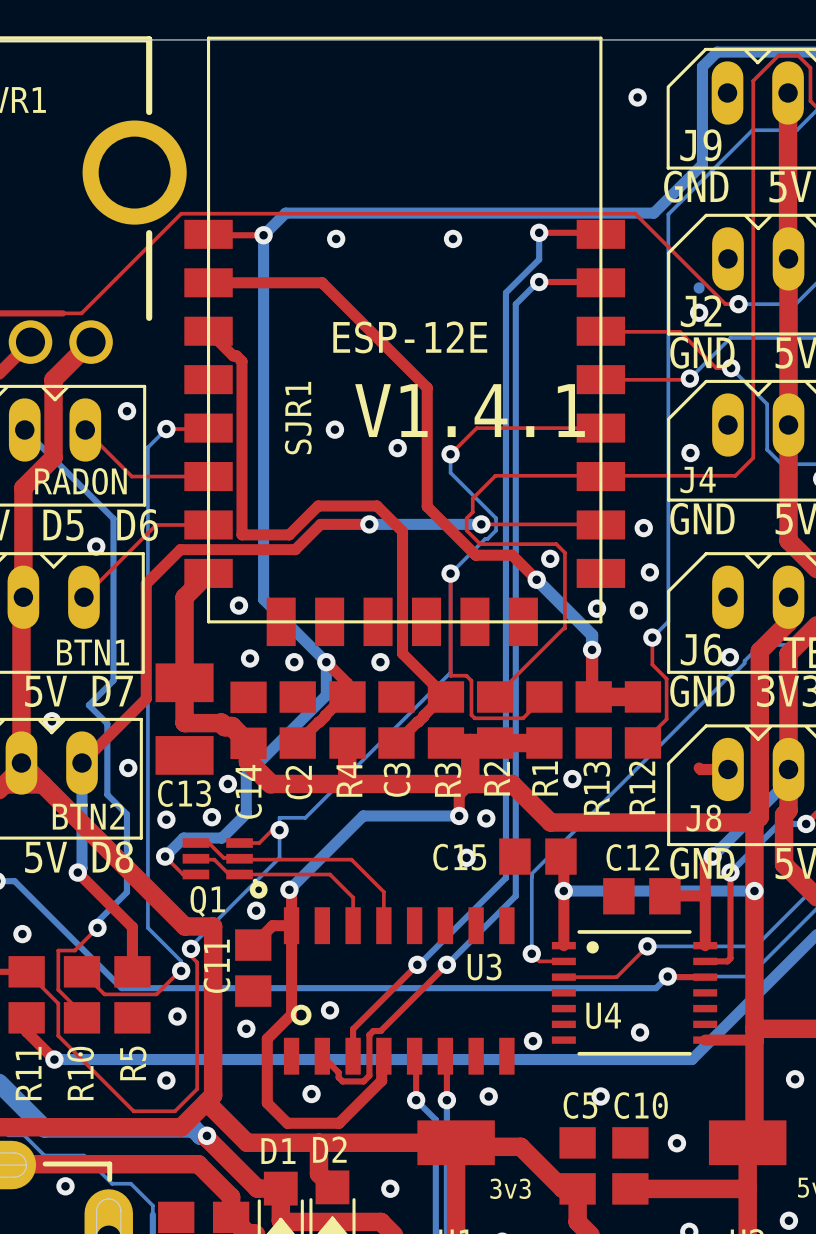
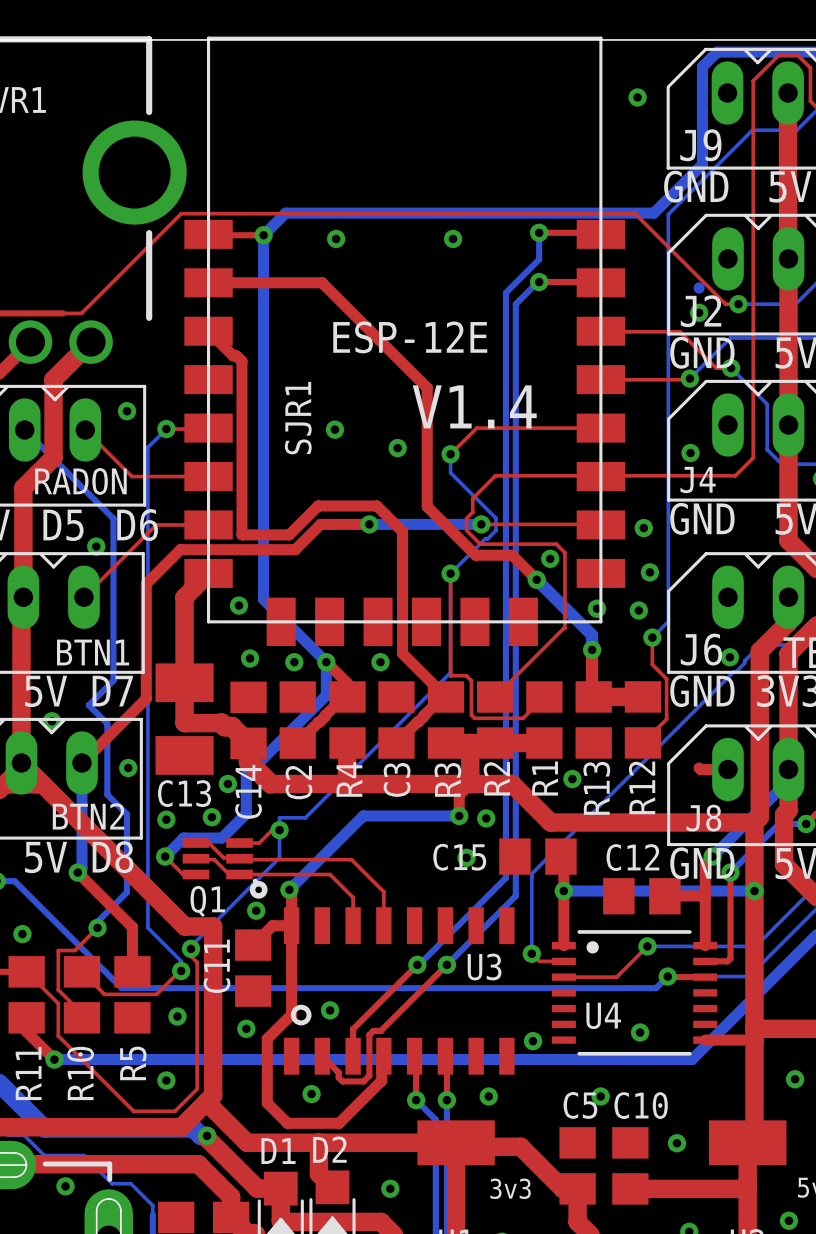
text: V1.4.1 (470, 410) -> V1.4 (474, 406)

